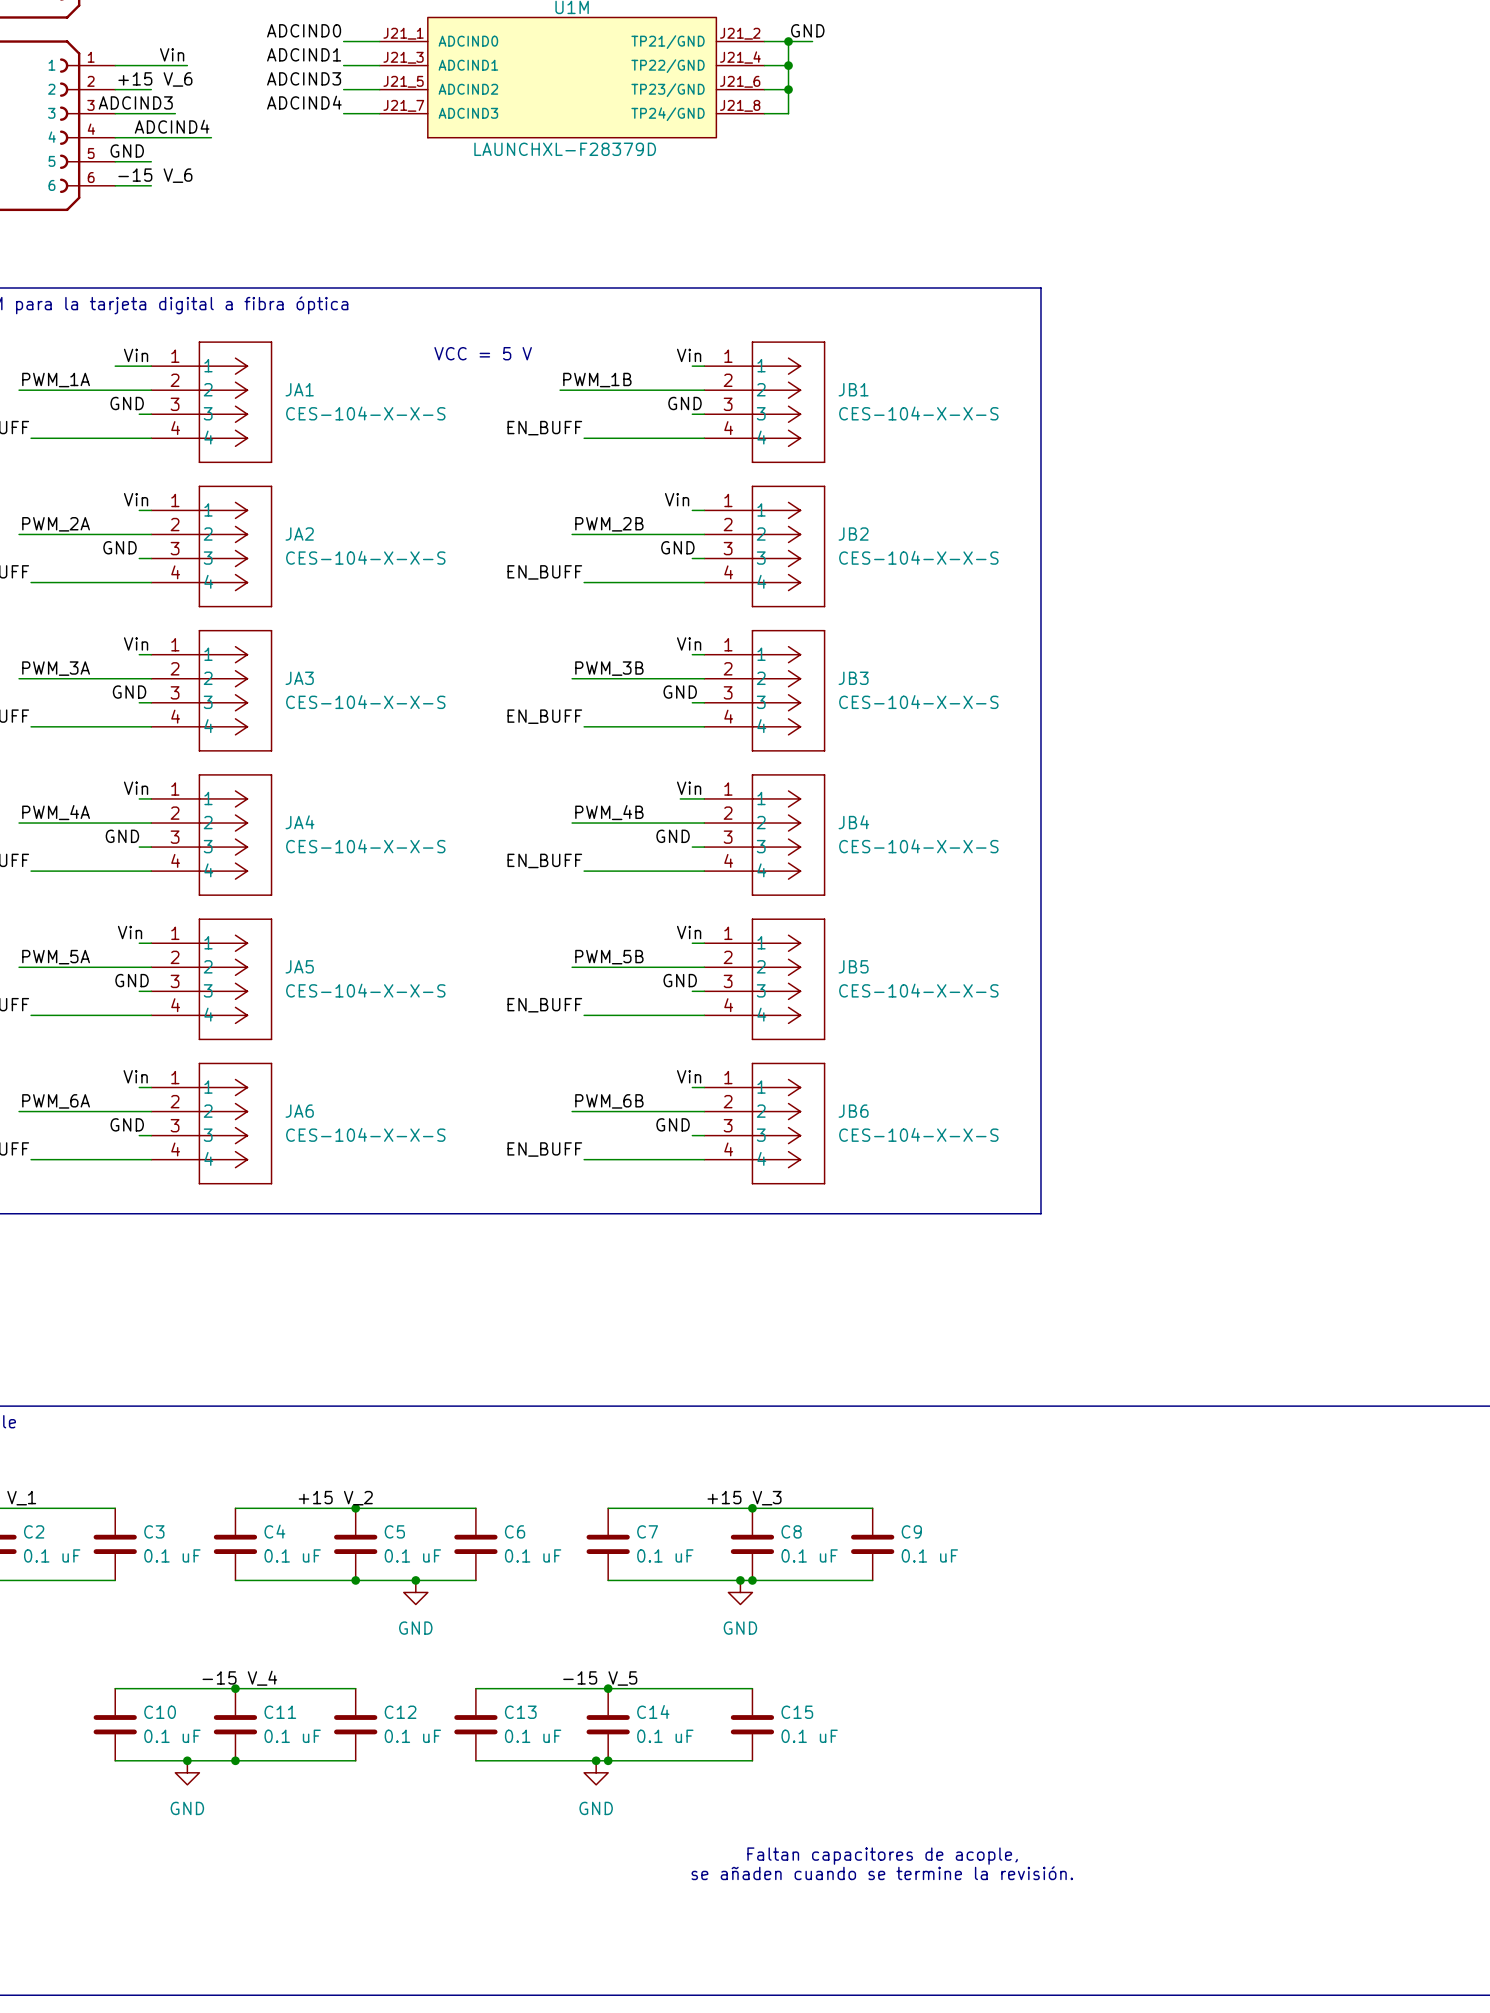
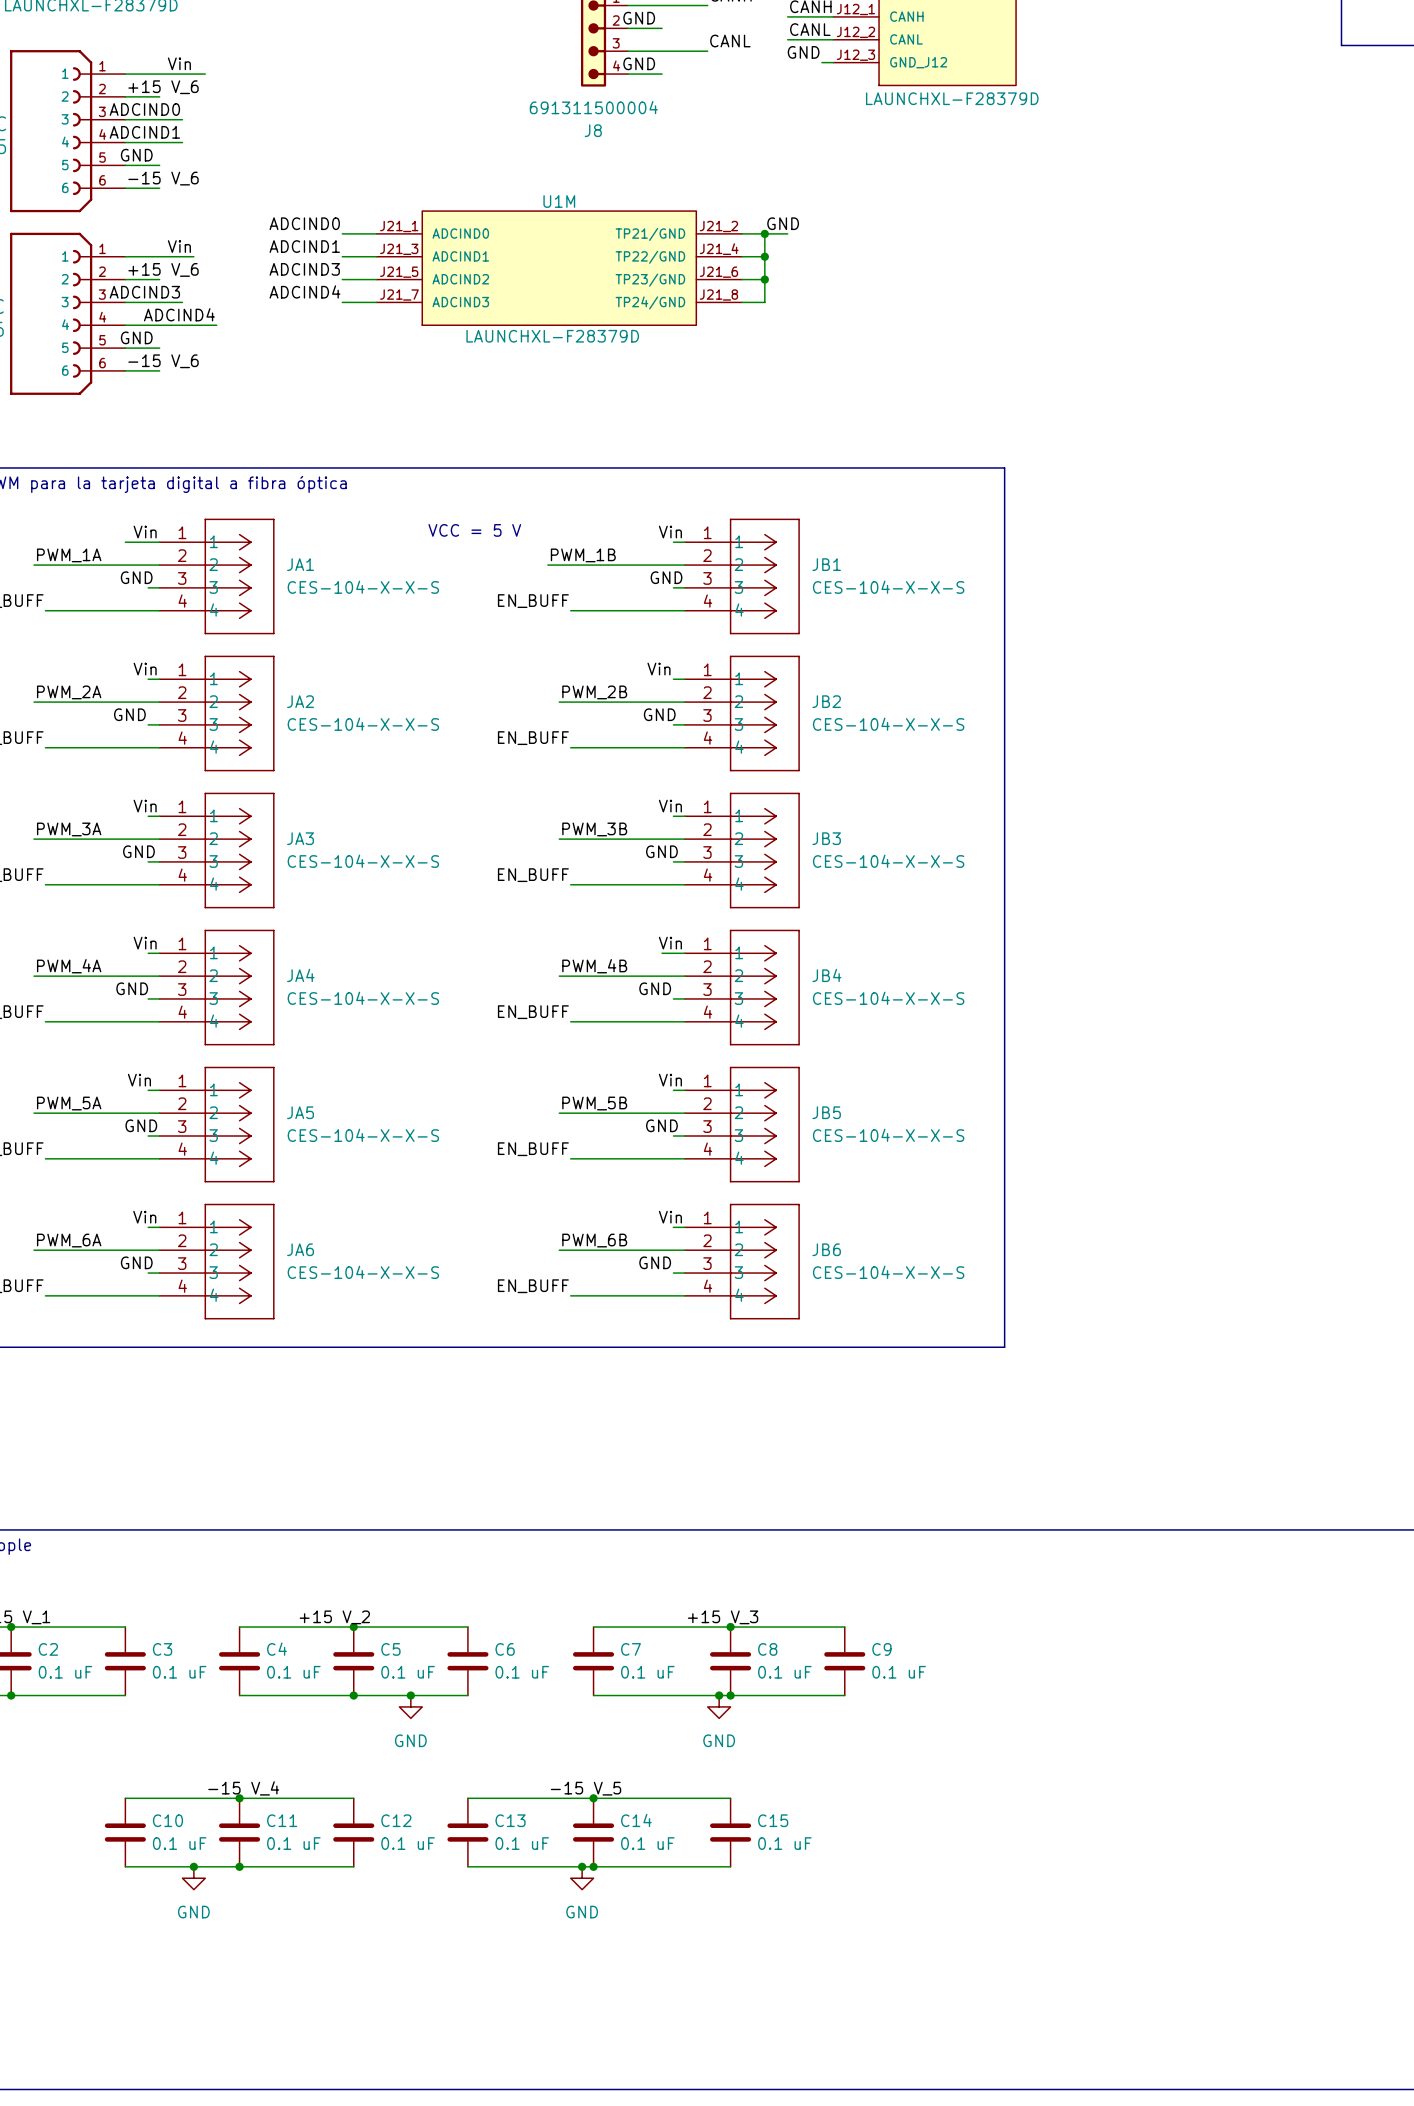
text: Faltan capacitores de acople, (882, 1856) -> none
text: se añaden cuando se termine la revisión. (882, 1873) -> none

